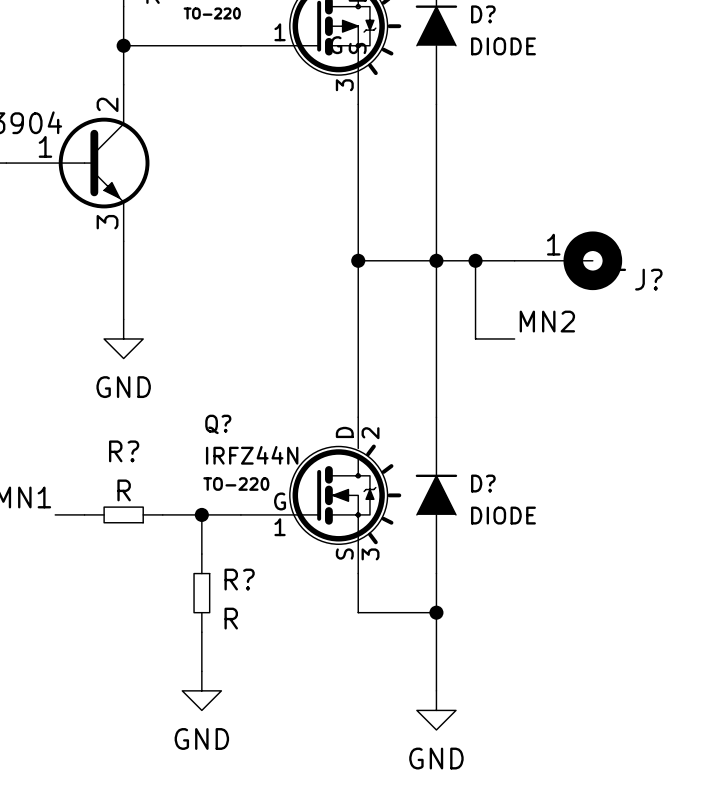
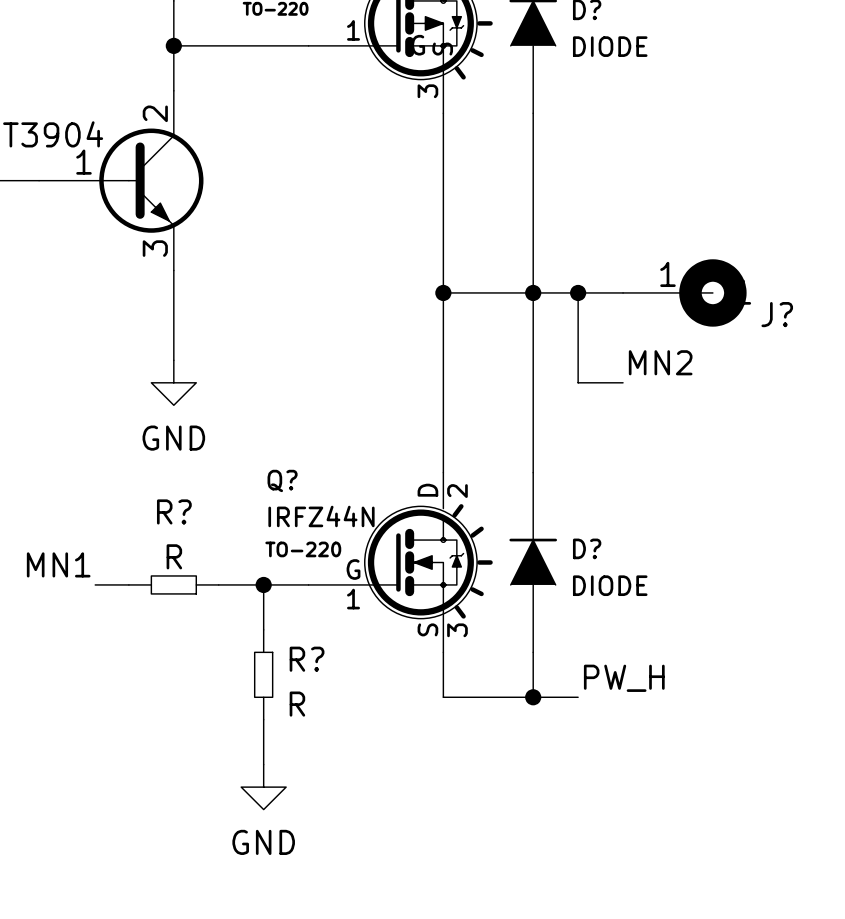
label: none -> PW_H (624, 678)
wire: (436, 612) (436, 690) -> (533, 697) (578, 697)
power symbol: GND (436, 710) -> none

